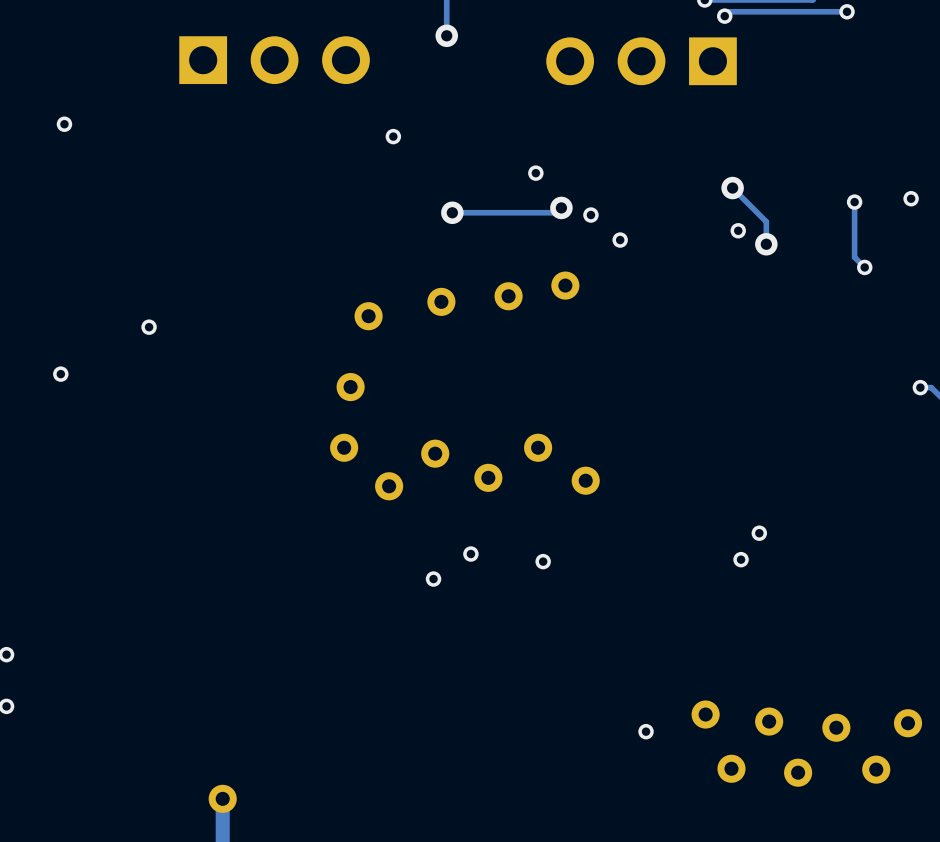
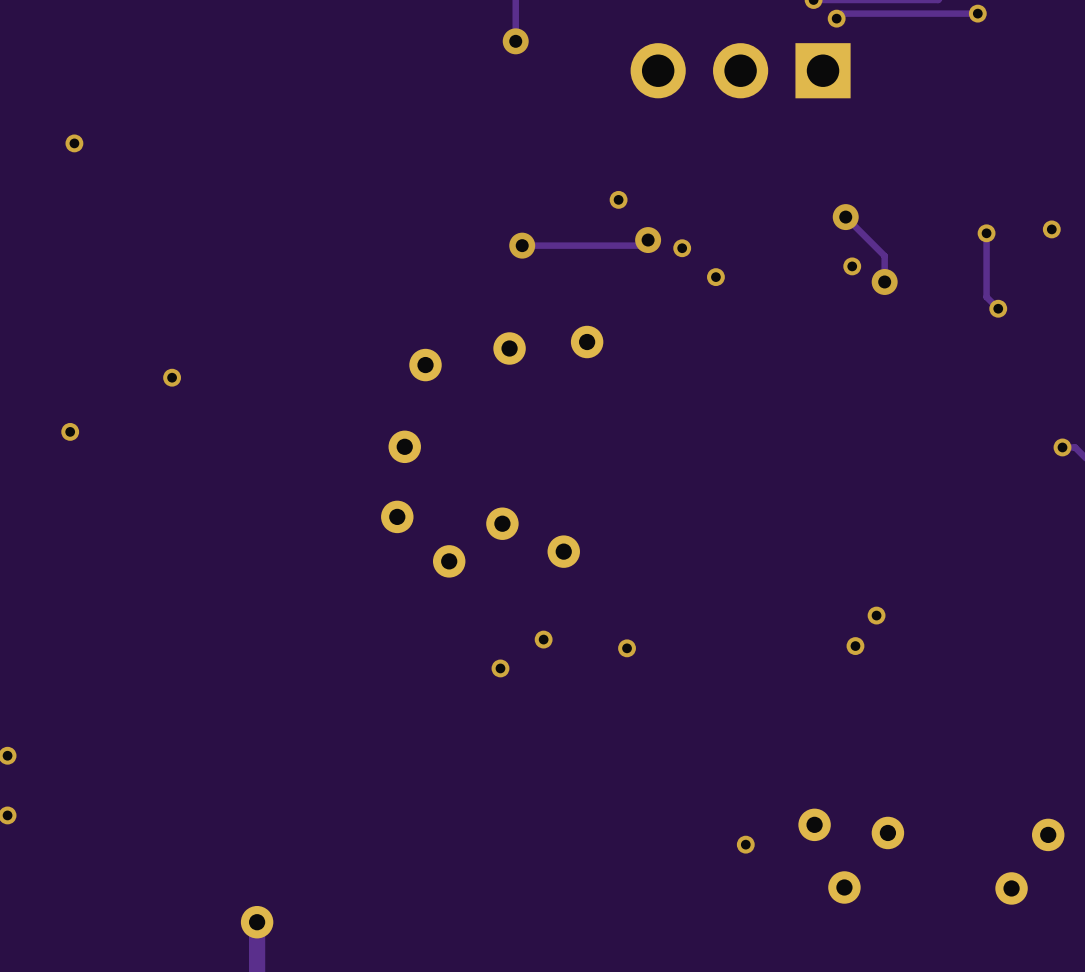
part: (274, 60) -> none
via: (393, 136) -> none
part: (565, 285) -> none
part: (538, 447) -> none
part: (585, 480) -> none
part: (836, 727) -> none
part: (798, 772) -> none

